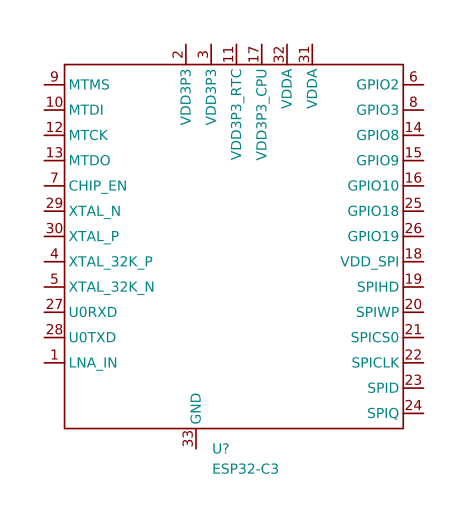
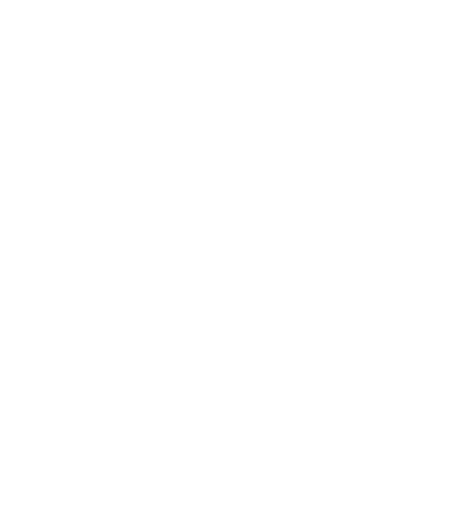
U?: ESP32-C3 (233, 246) -> none

